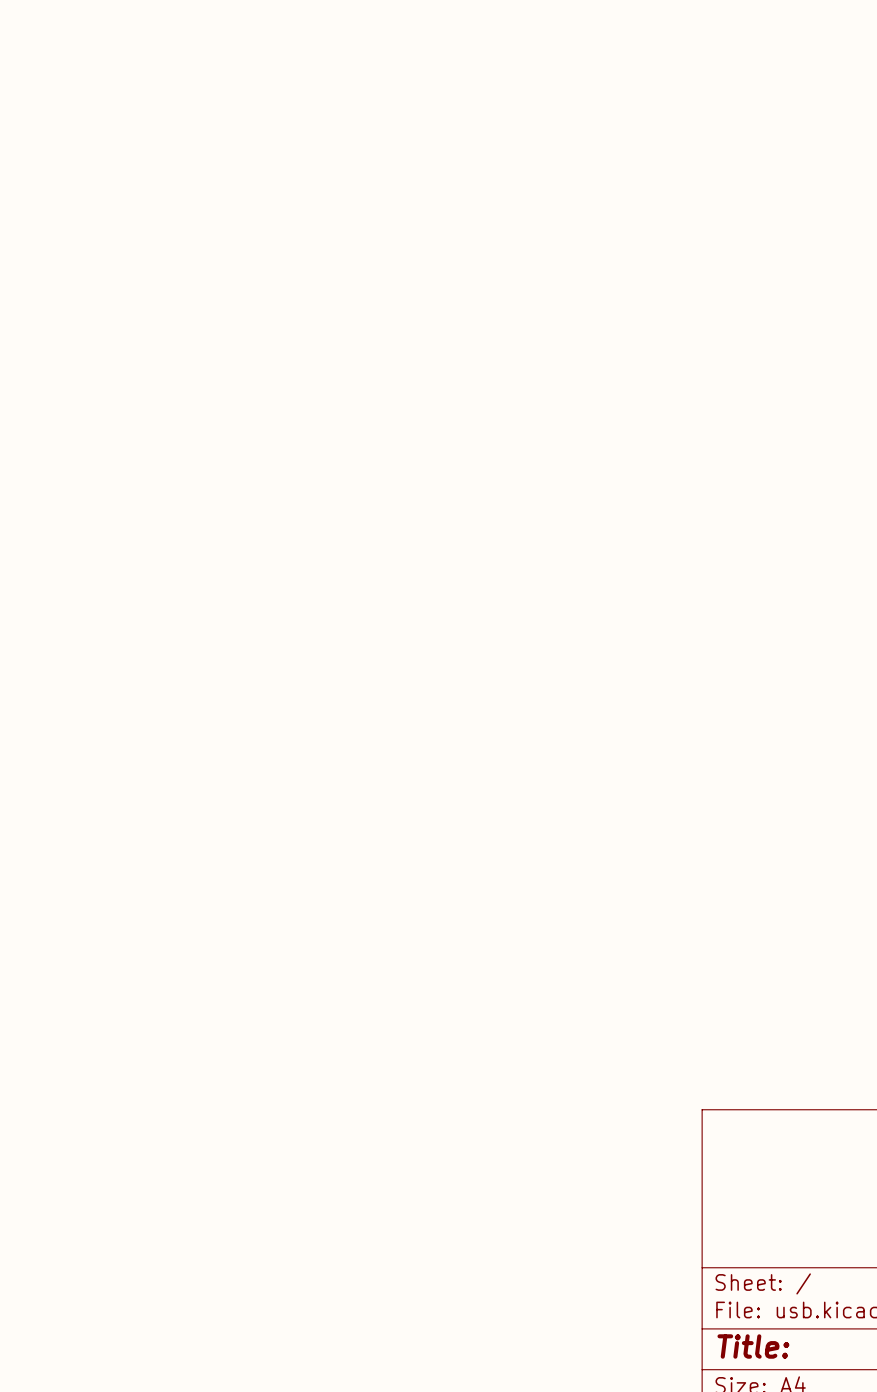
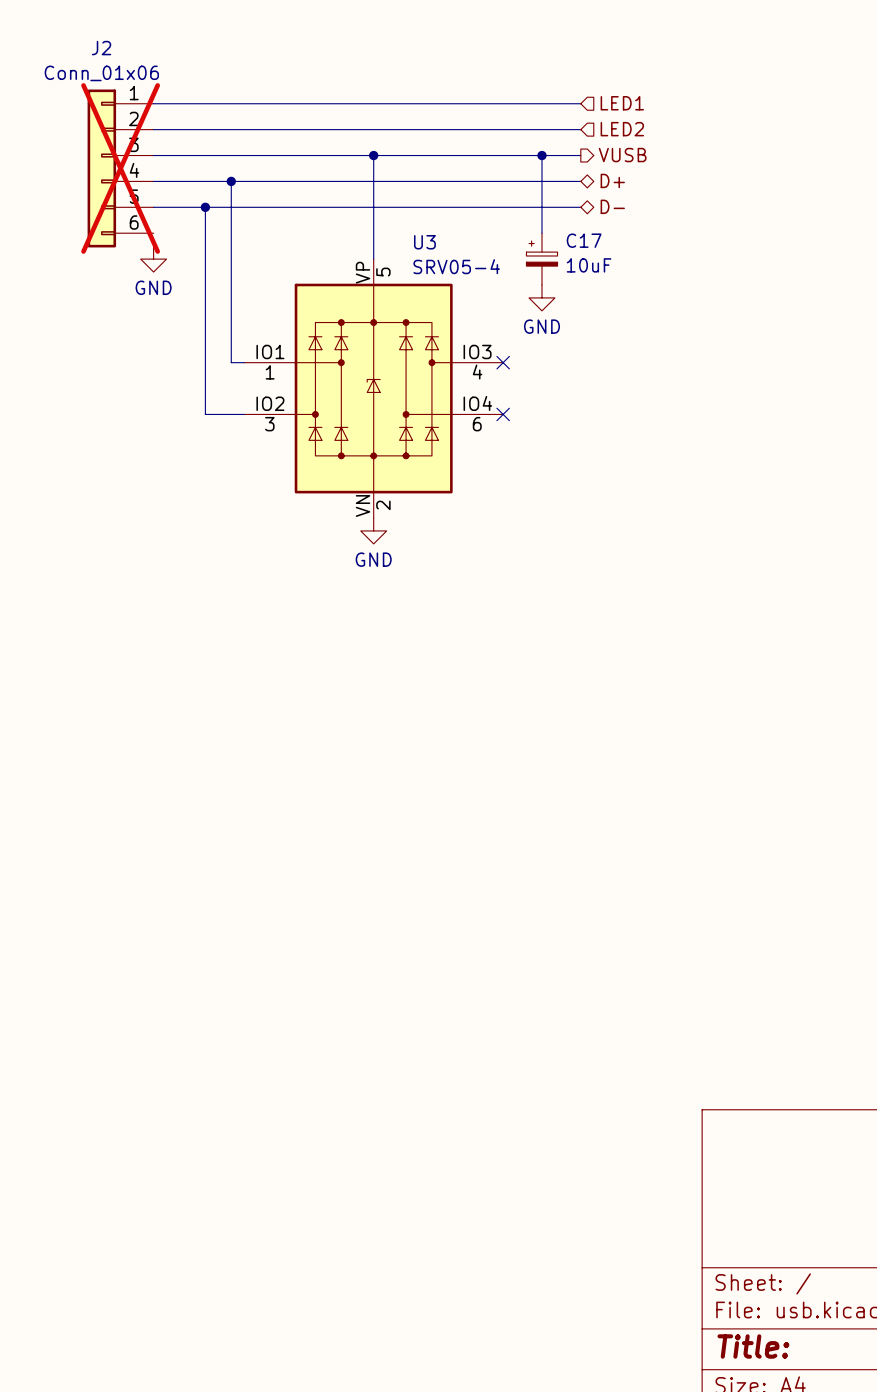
wire: none -> (153, 103) (580, 103)
hierarchical label: none -> LED1 (622, 103)
wire: none -> (153, 129) (580, 129)
hierarchical label: none -> LED2 (622, 129)
wire: none -> (153, 155) (580, 155)
wire: none -> (373, 155) (373, 259)
junction: none -> (373, 155)
wire: none -> (541, 155) (541, 233)
junction: none -> (541, 155)
hierarchical label: none -> VUSB (622, 155)
J2: none -> Conn_01x06 (120, 168)
hierarchical label: none -> D+ (612, 180)
wire: none -> (153, 181) (580, 181)
wire: none -> (231, 181) (231, 362) (244, 362)
junction: none -> (231, 181)
hierarchical label: none -> D- (612, 206)
wire: none -> (153, 207) (580, 207)
wire: none -> (205, 207) (205, 414) (244, 414)
junction: none -> (205, 207)
power symbol: none -> GND (153, 259)
C17: none -> 10uF (541, 259)
power symbol: none -> GND (541, 297)
no-connect mark: none -> (503, 362)
U3: none -> SRV05-4 (373, 388)
no-connect mark: none -> (503, 414)
power symbol: none -> GND (373, 530)

